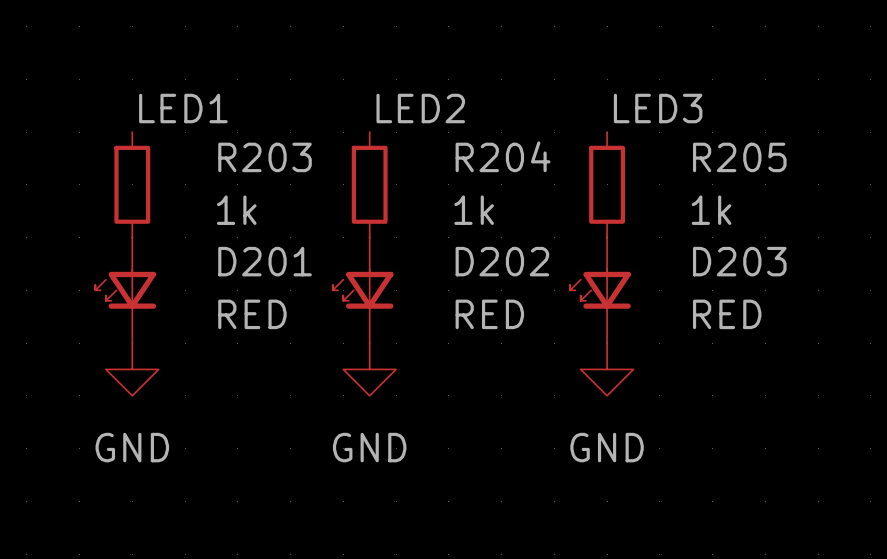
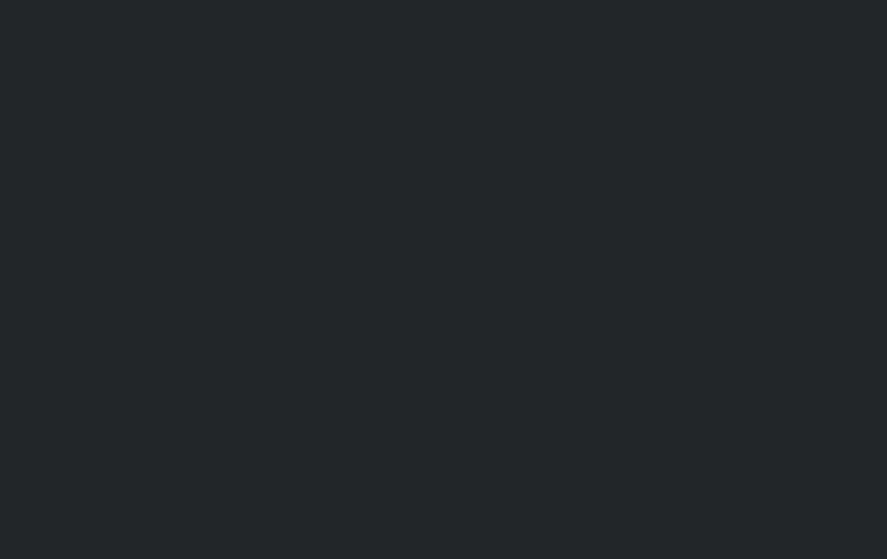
label: LED1 (183, 108) -> none
label: LED2 (420, 108) -> none
label: LED3 (658, 108) -> none
R203: 1k (132, 184) -> none
R204: 1k (369, 184) -> none
R205: 1k (607, 184) -> none
D201: RED (125, 290) -> none
D202: RED (363, 290) -> none
D203: RED (600, 290) -> none
power symbol: GND (132, 369) -> none
power symbol: GND (369, 369) -> none
power symbol: GND (607, 369) -> none

